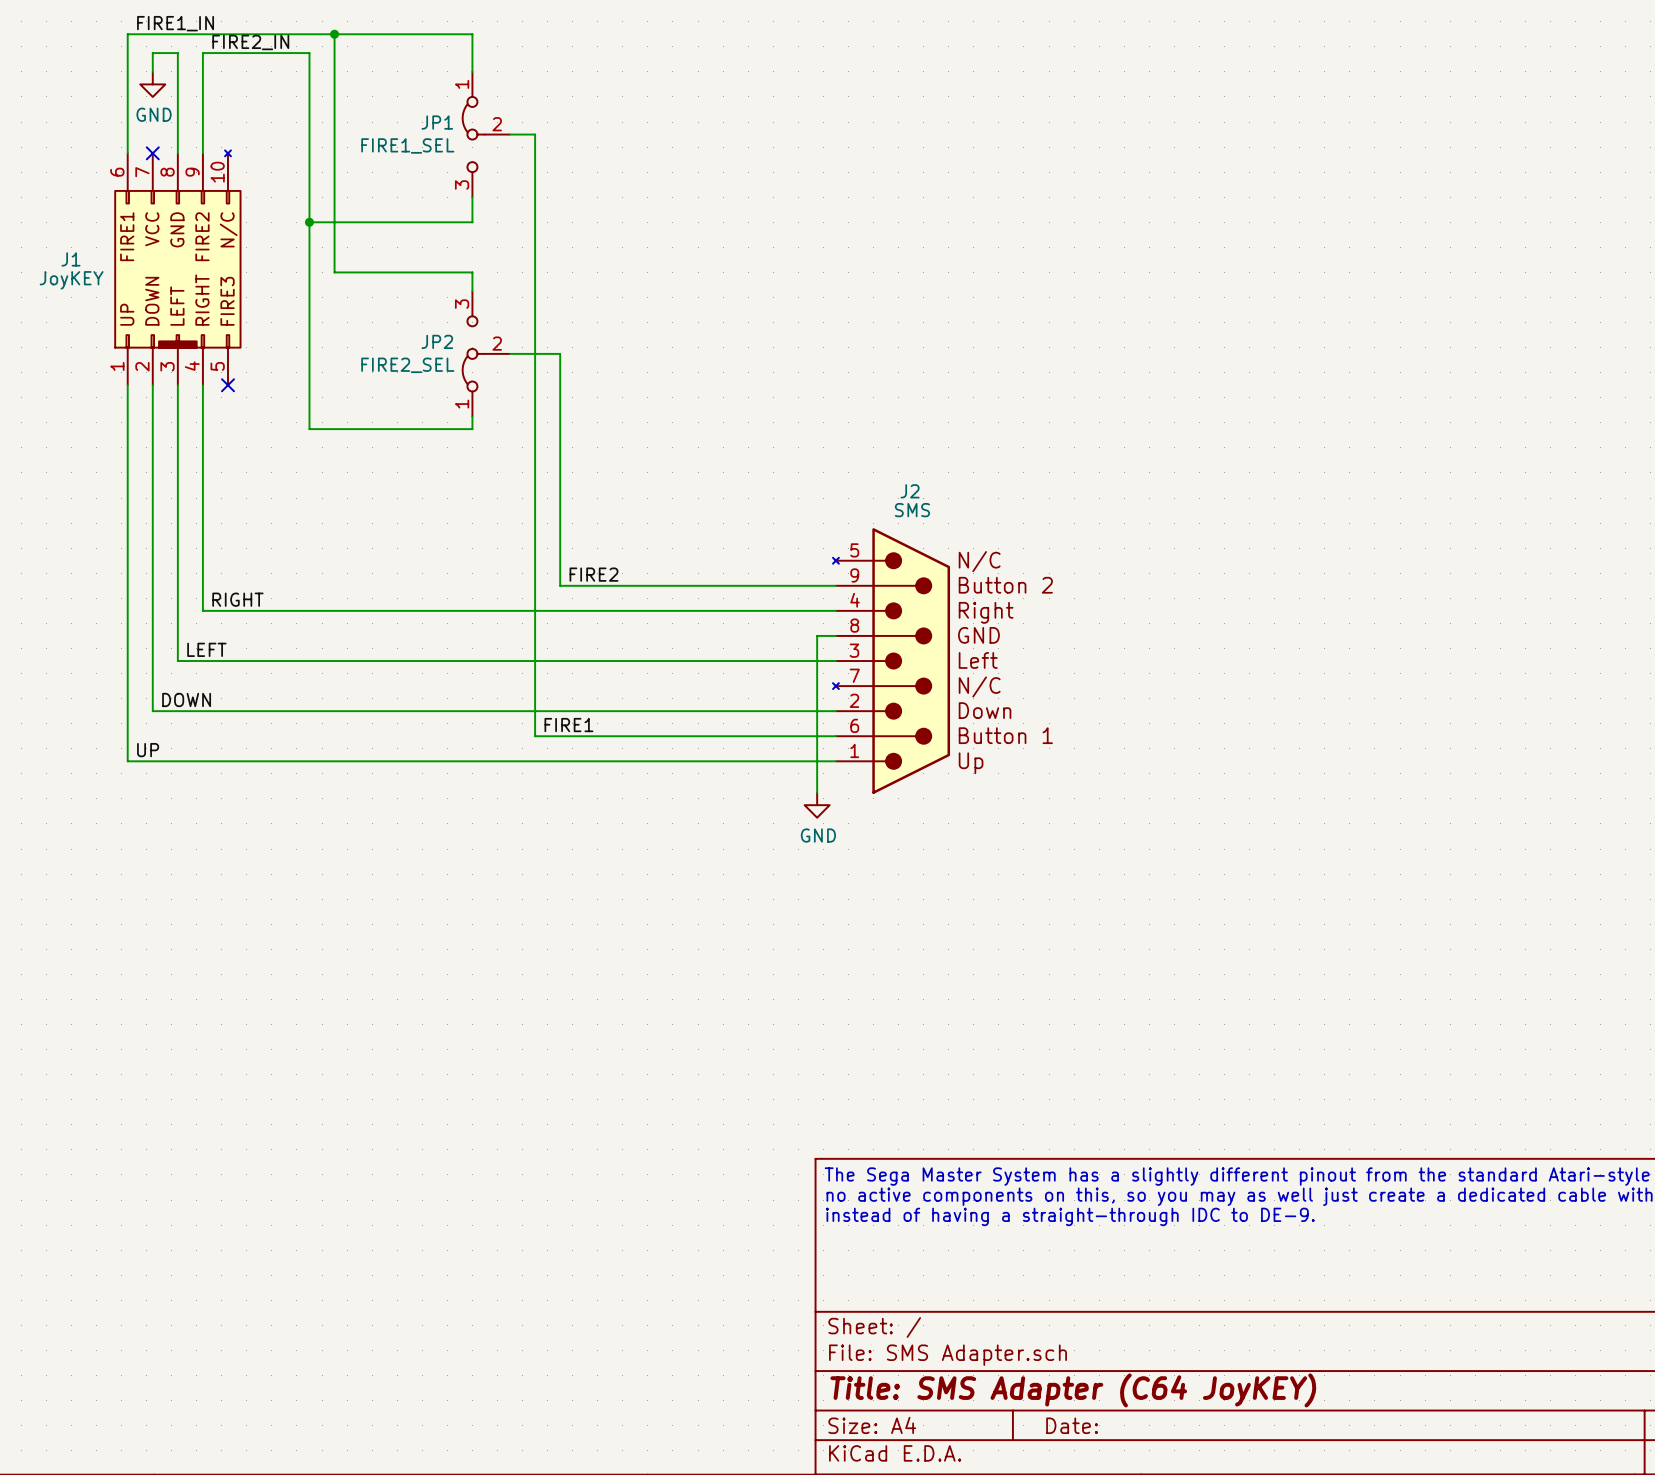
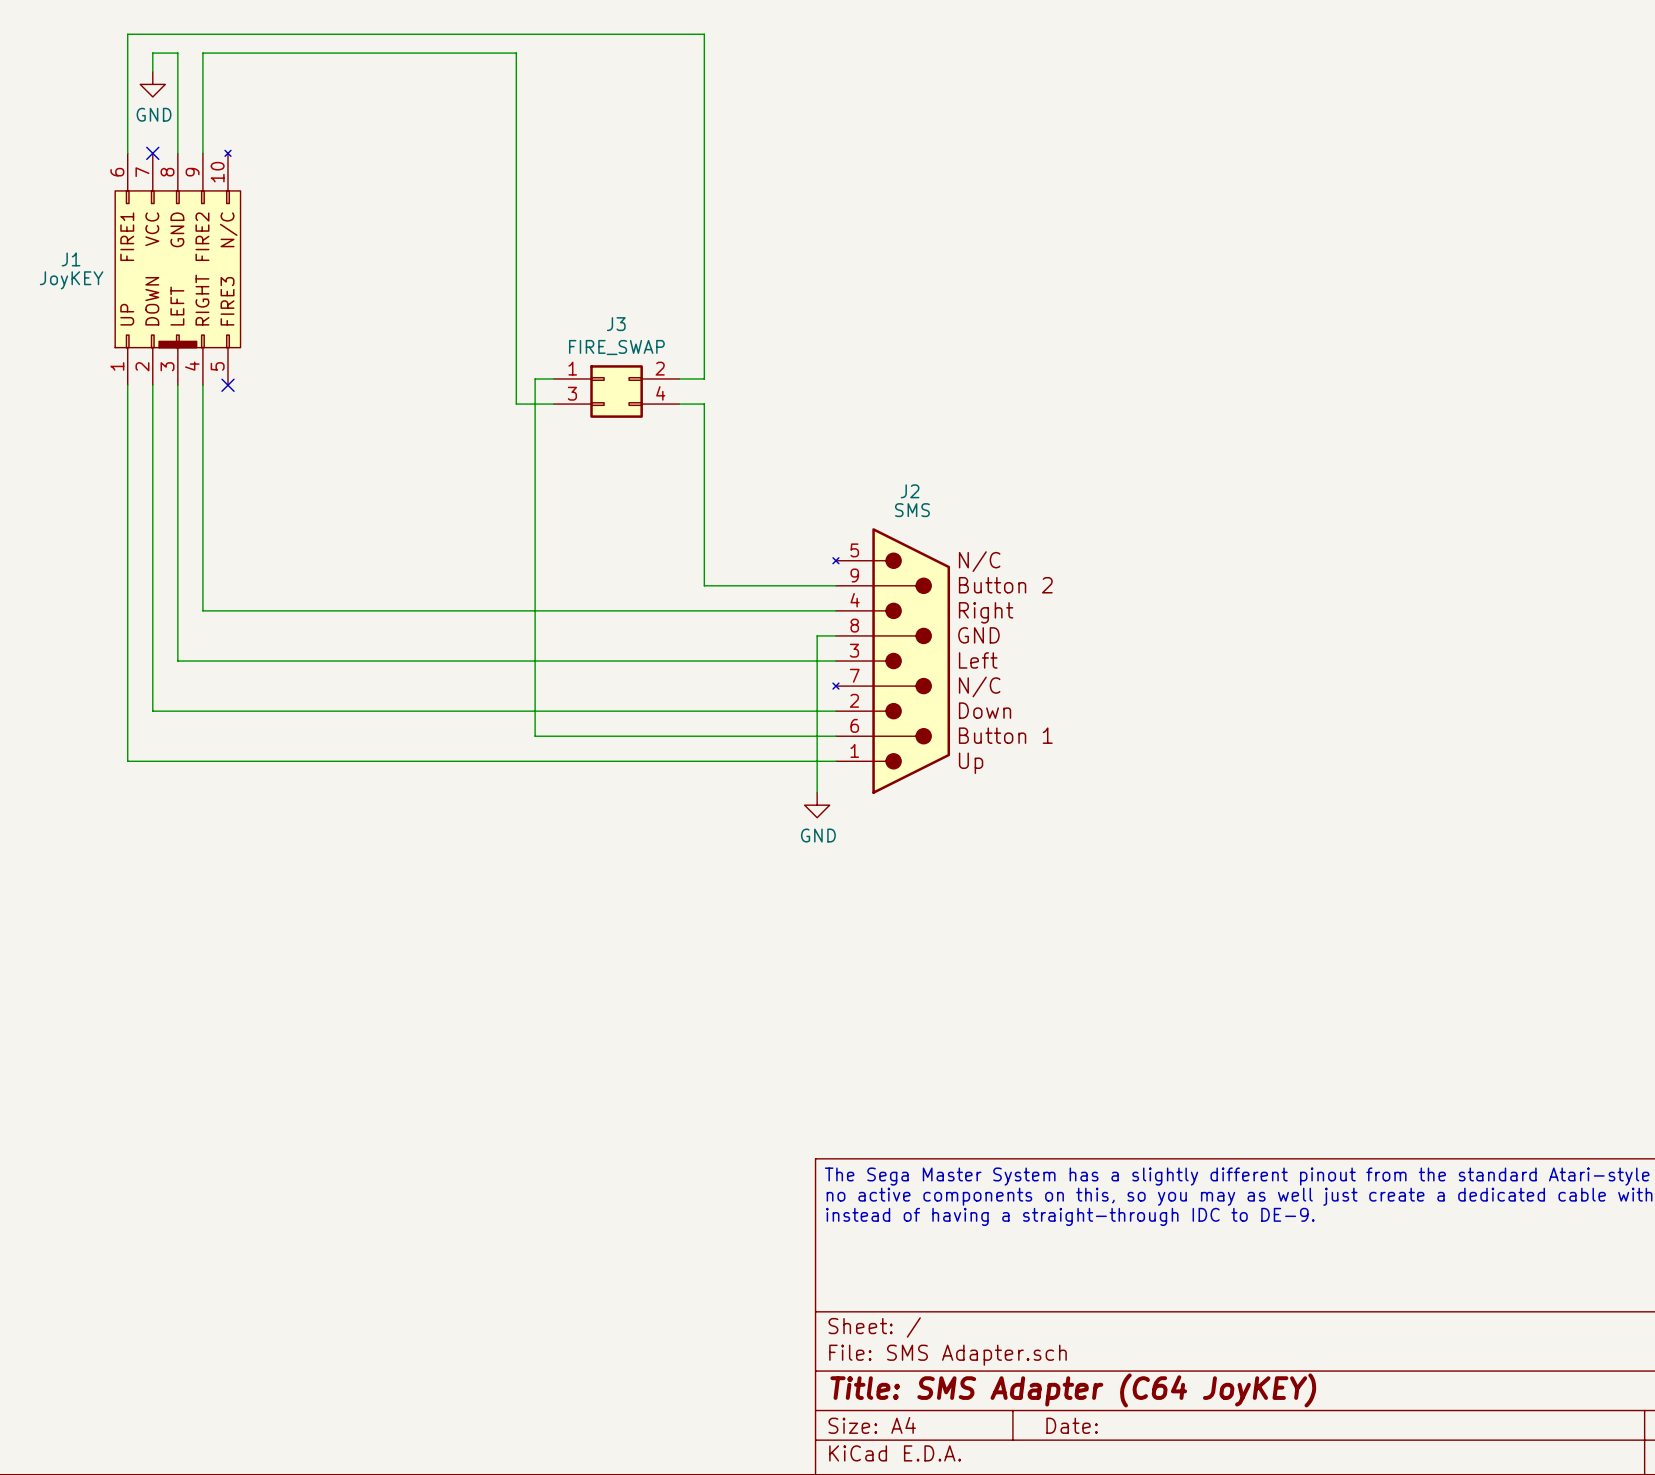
label: FIRE1_IN (175, 23) -> none
wire: (334, 34) (334, 272) (472, 272) (472, 291) -> none
junction: (334, 34) -> none
wire: (472, 34) (472, 71) -> (472, 34) (704, 34) (704, 378) (679, 378)
label: FIRE2_IN (250, 42) -> none
wire: (309, 53) (309, 429) (472, 429) (472, 416) -> (309, 53) (516, 53) (516, 404) (553, 404)
JP1: FIRE1_SEL (486, 134) -> none
wire: (510, 134) (535, 134) (535, 378) -> (553, 378) (535, 378)
wire: (472, 197) (472, 222) (309, 222) -> none
junction: (309, 222) -> none
JP2: FIRE2_SEL (486, 353) -> none
wire: (510, 353) (560, 353) (560, 585) (704, 585) -> (679, 404) (704, 404) (704, 585)
J3: none -> FIRE_SWAP (616, 391)
label: FIRE2 (594, 574) -> none
label: RIGHT (237, 599) -> none
label: LEFT (206, 649) -> none
label: DOWN (186, 699) -> none
label: FIRE1 (568, 725) -> none
label: UP (148, 750) -> none

